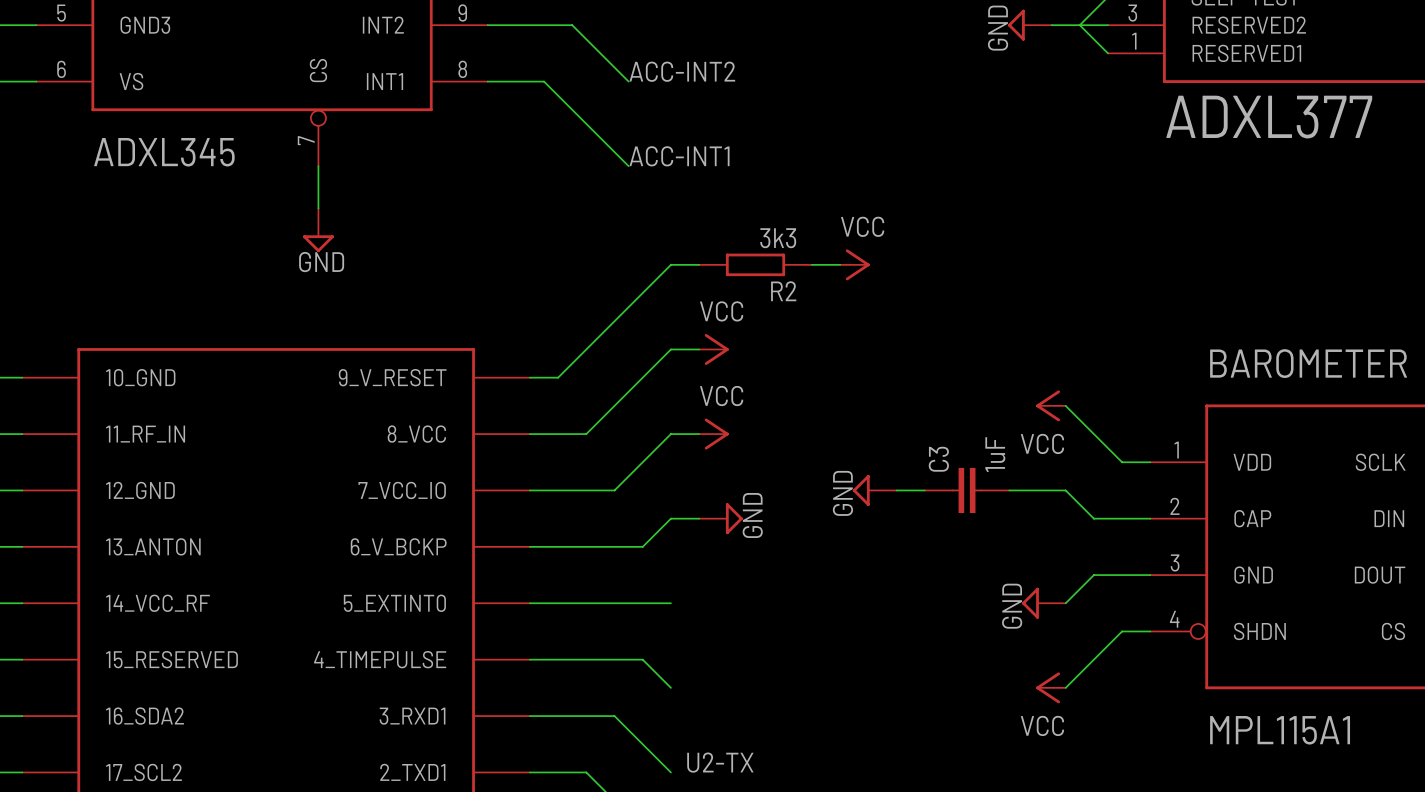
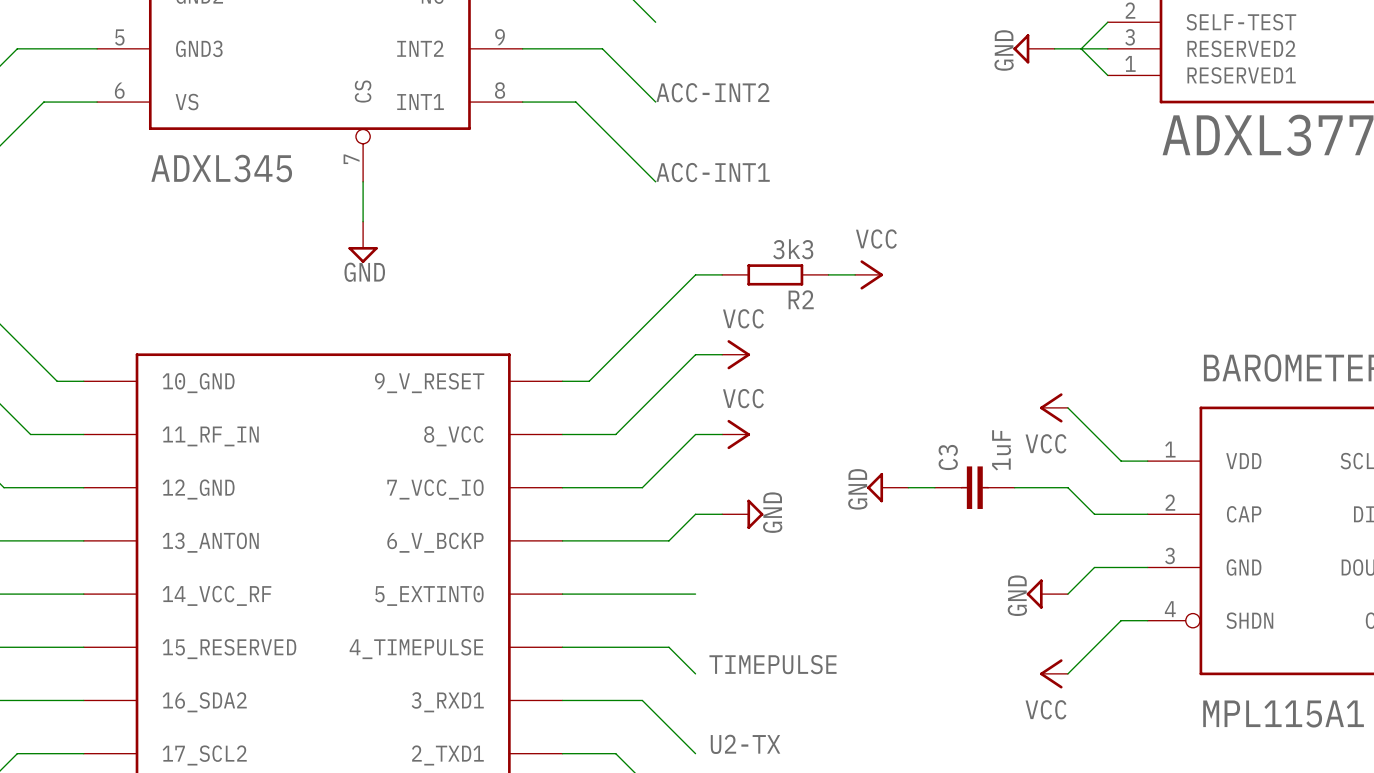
label: none -> TIMEPULSE (773, 664)

